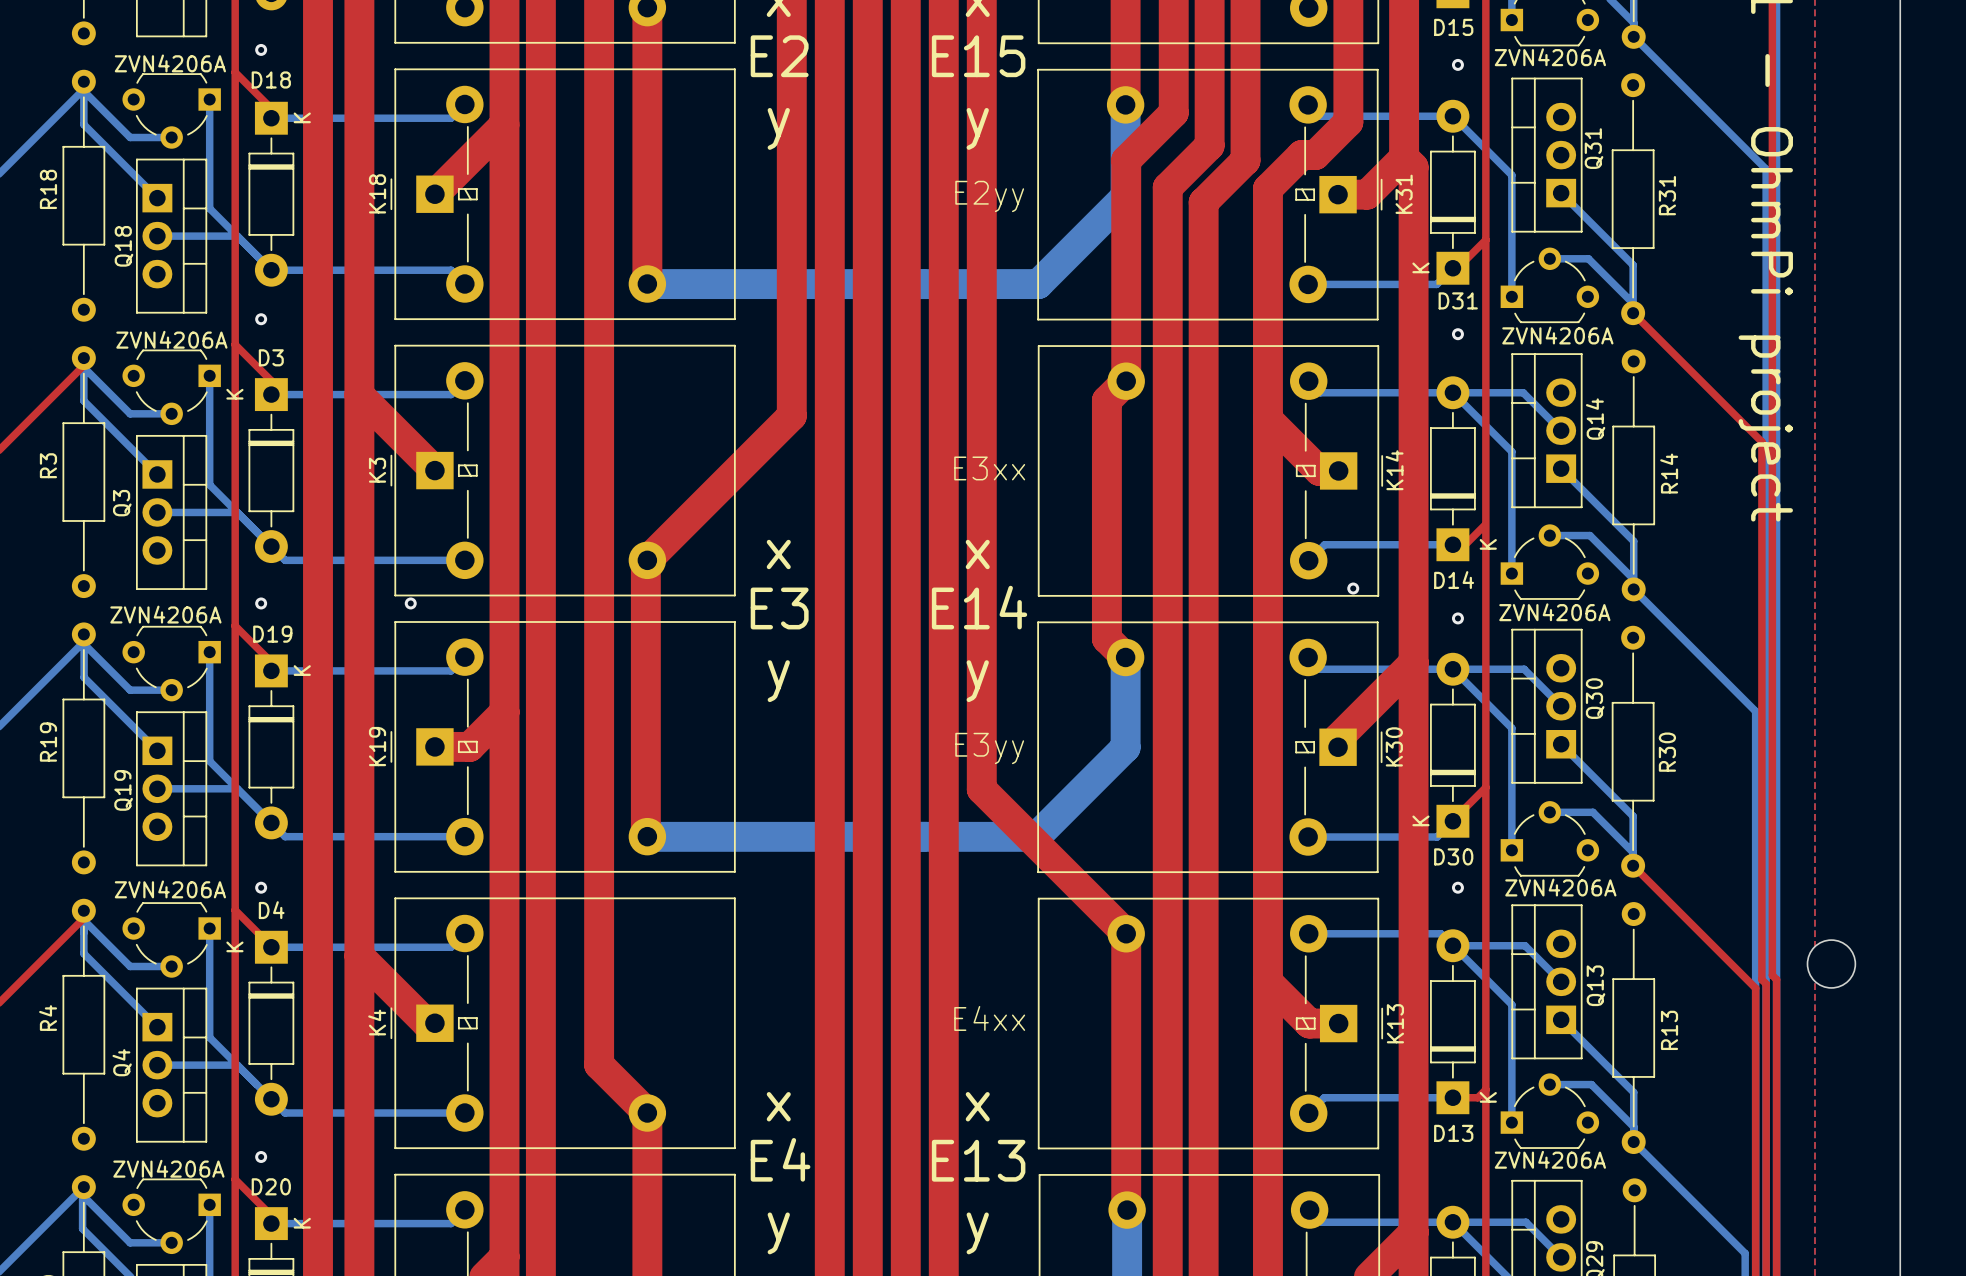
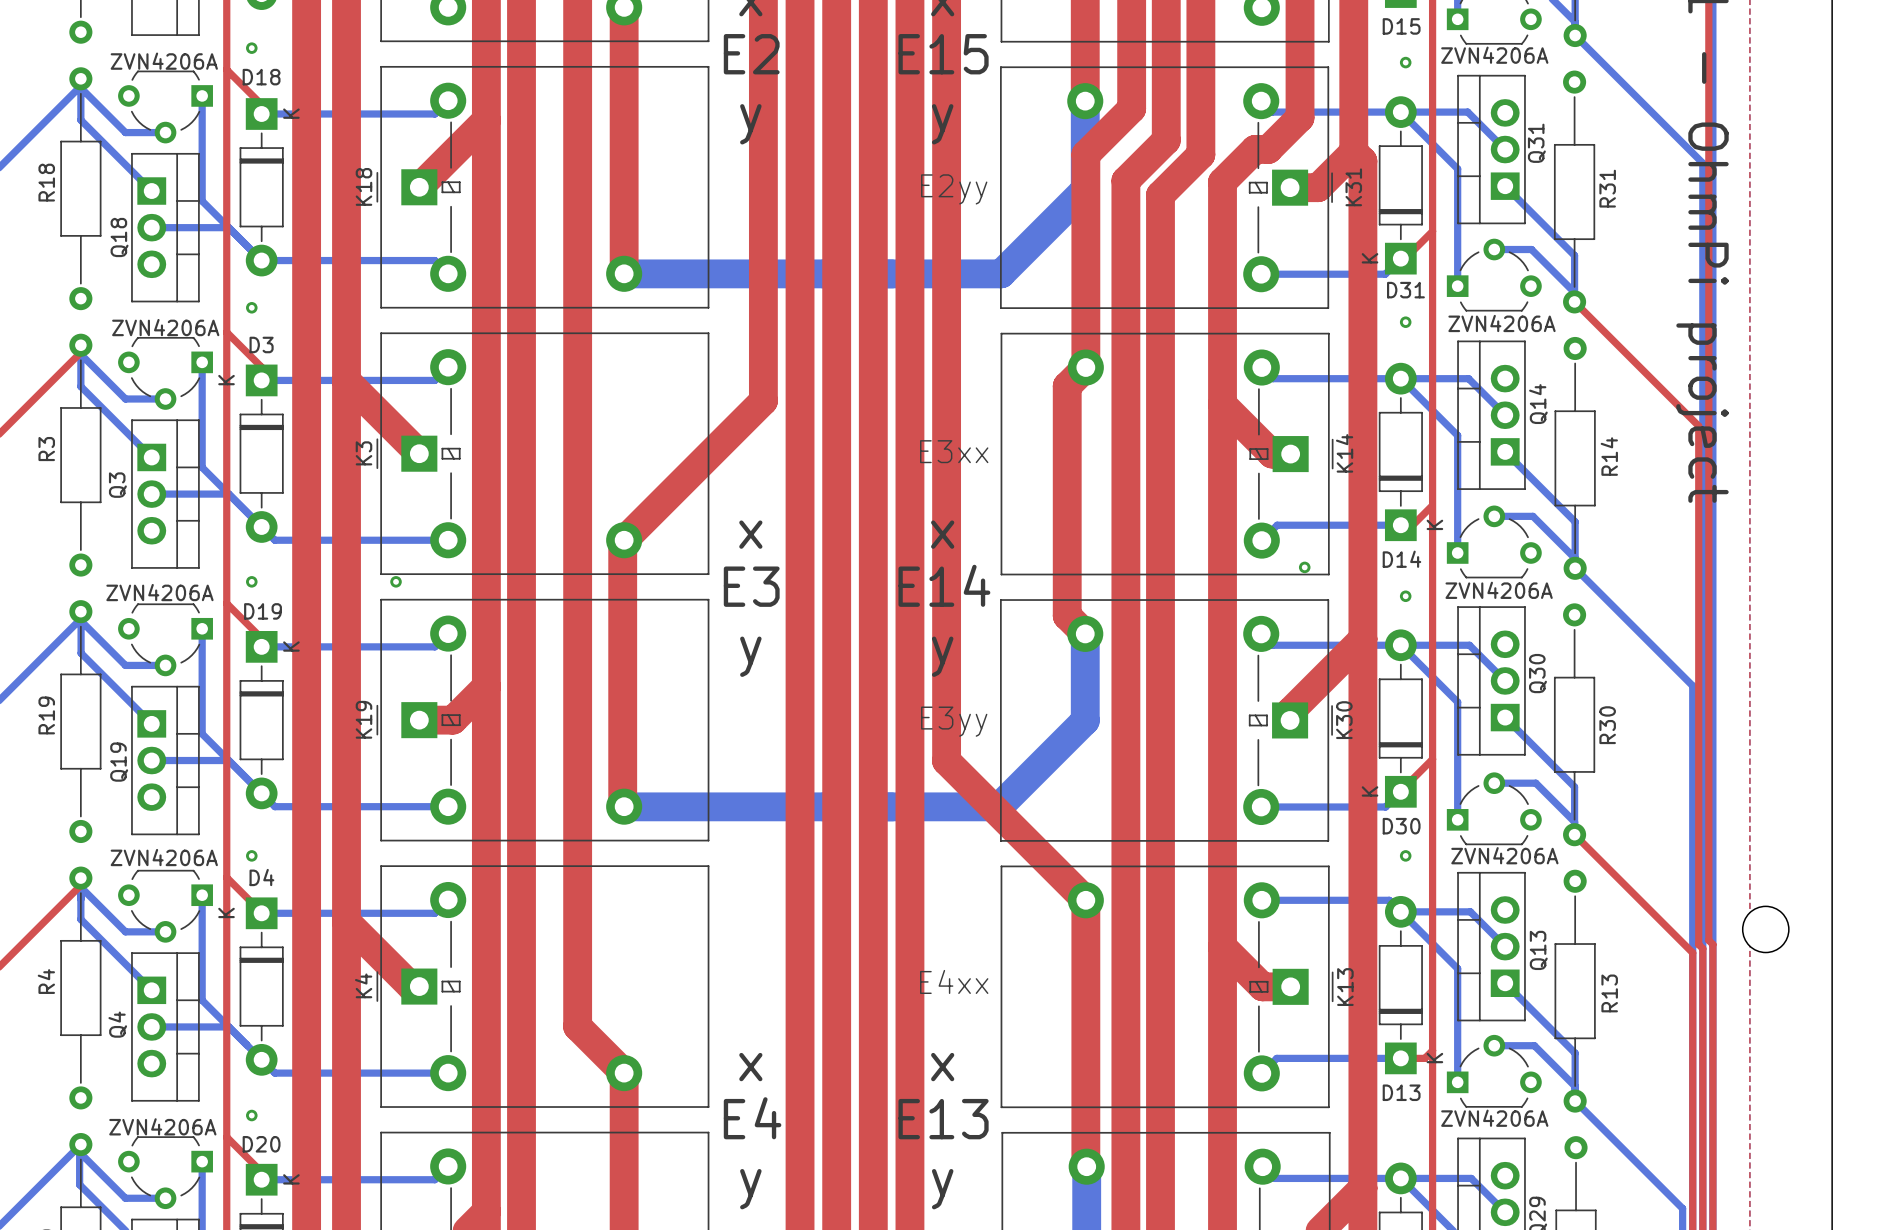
bottom track: none -> (1400, 112) (1467, 112) (1505, 149)

